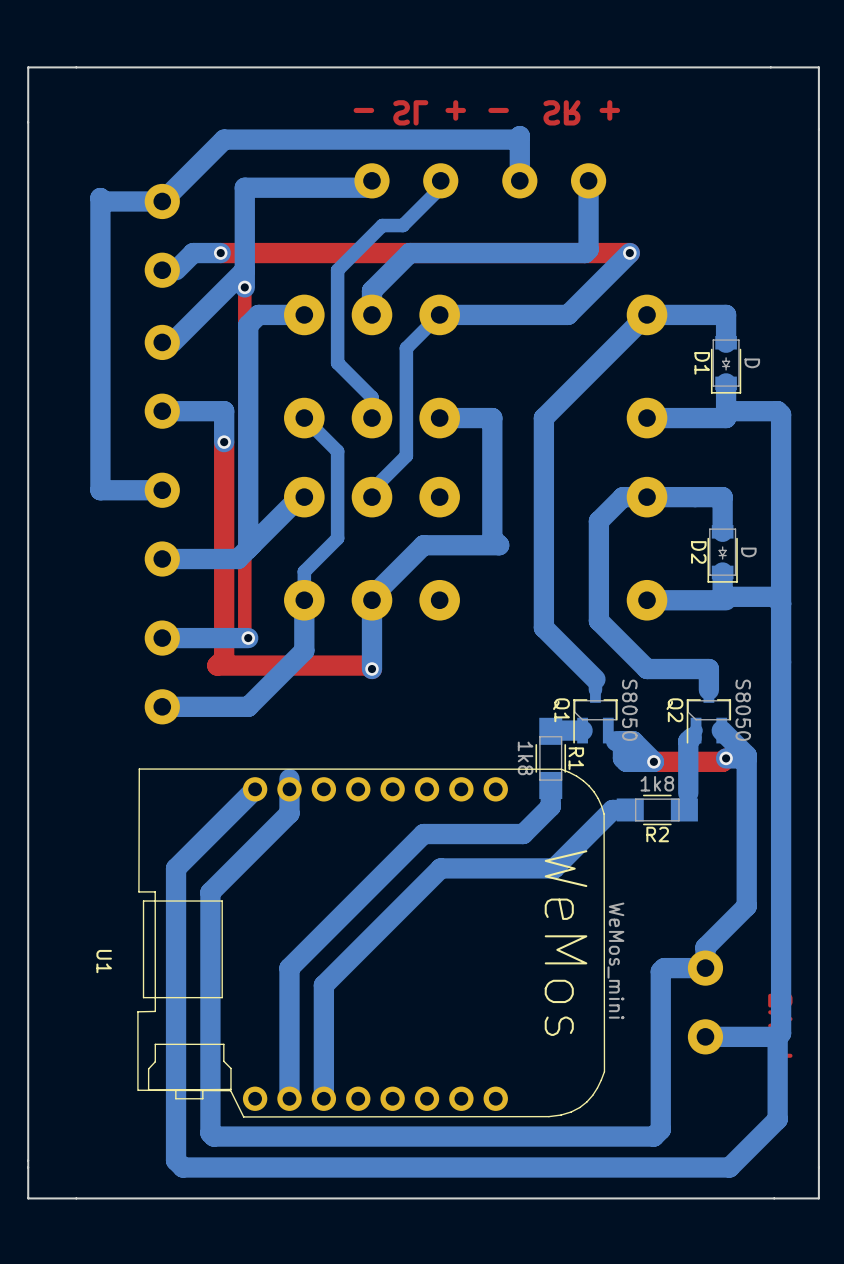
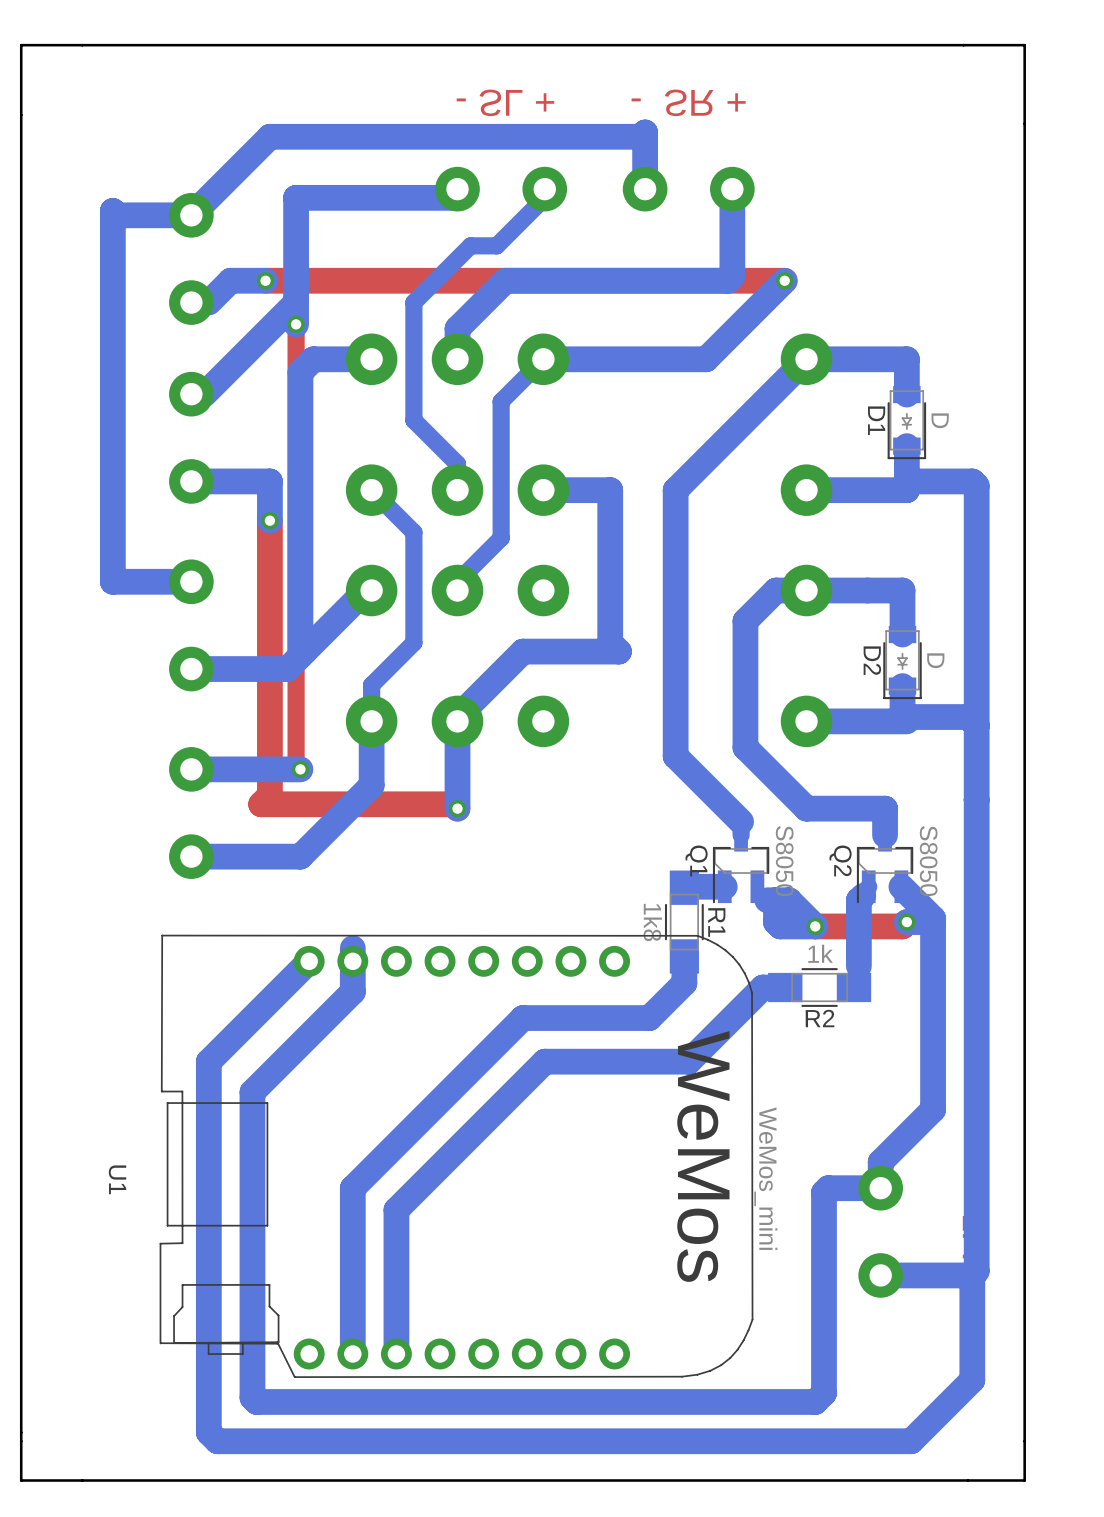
R2 value: 1k8 (657, 783) -> 1k (820, 953)

